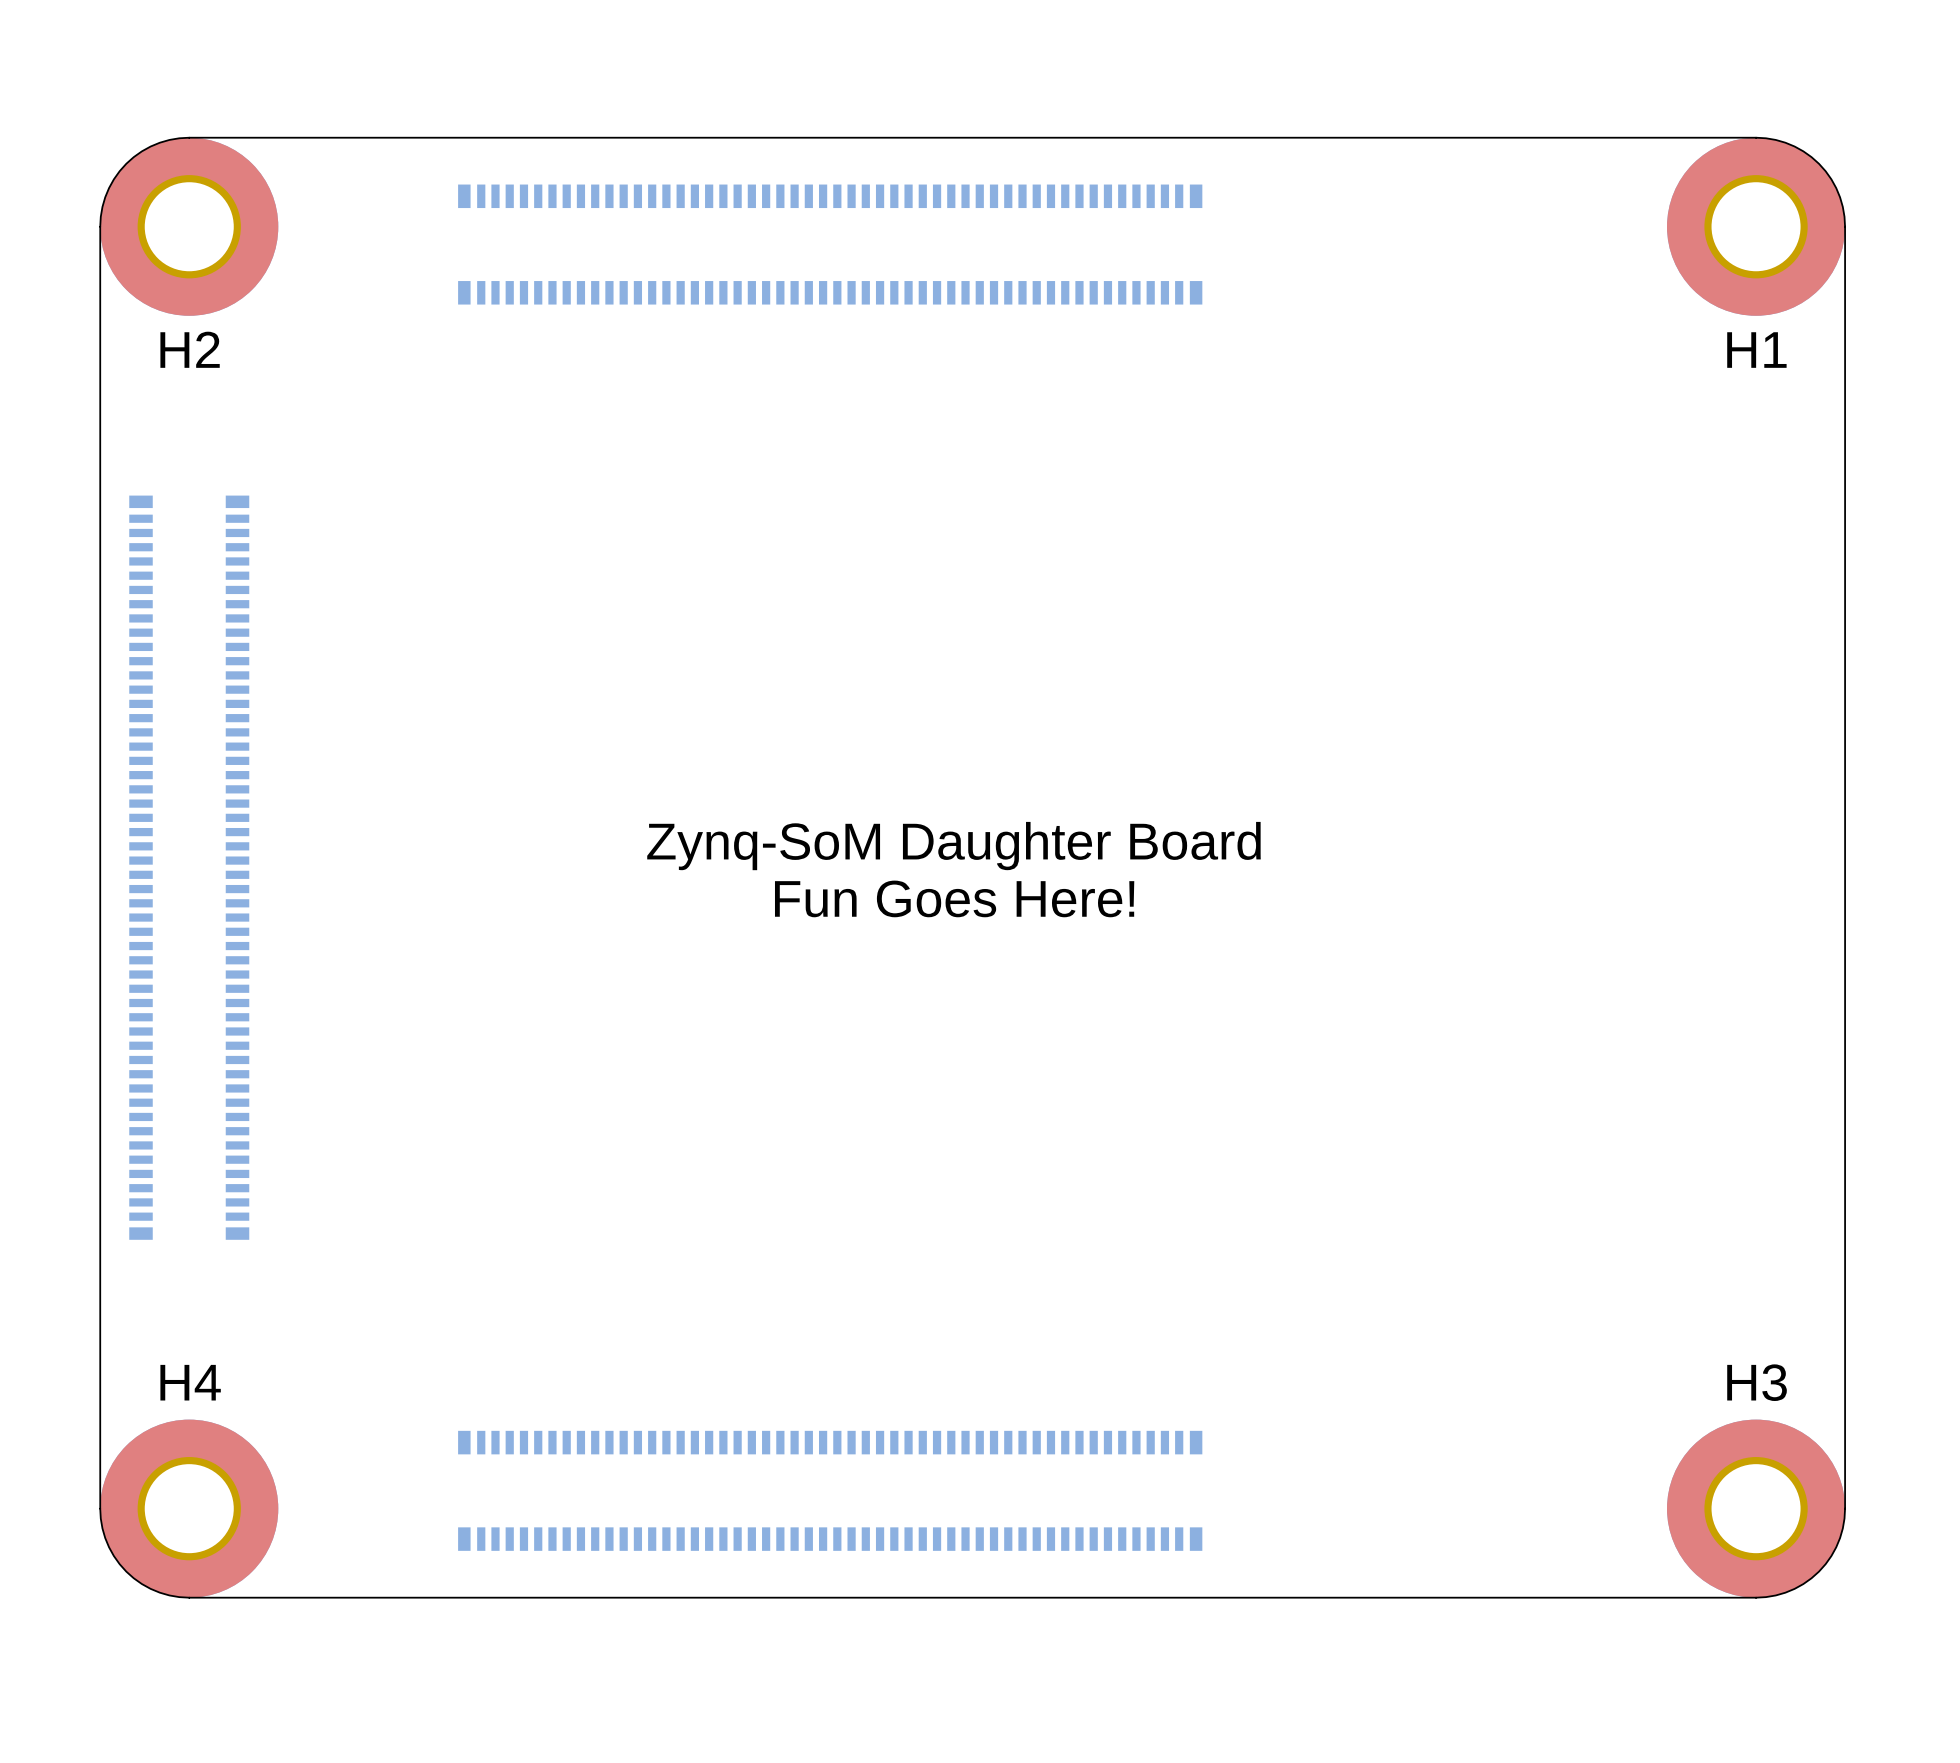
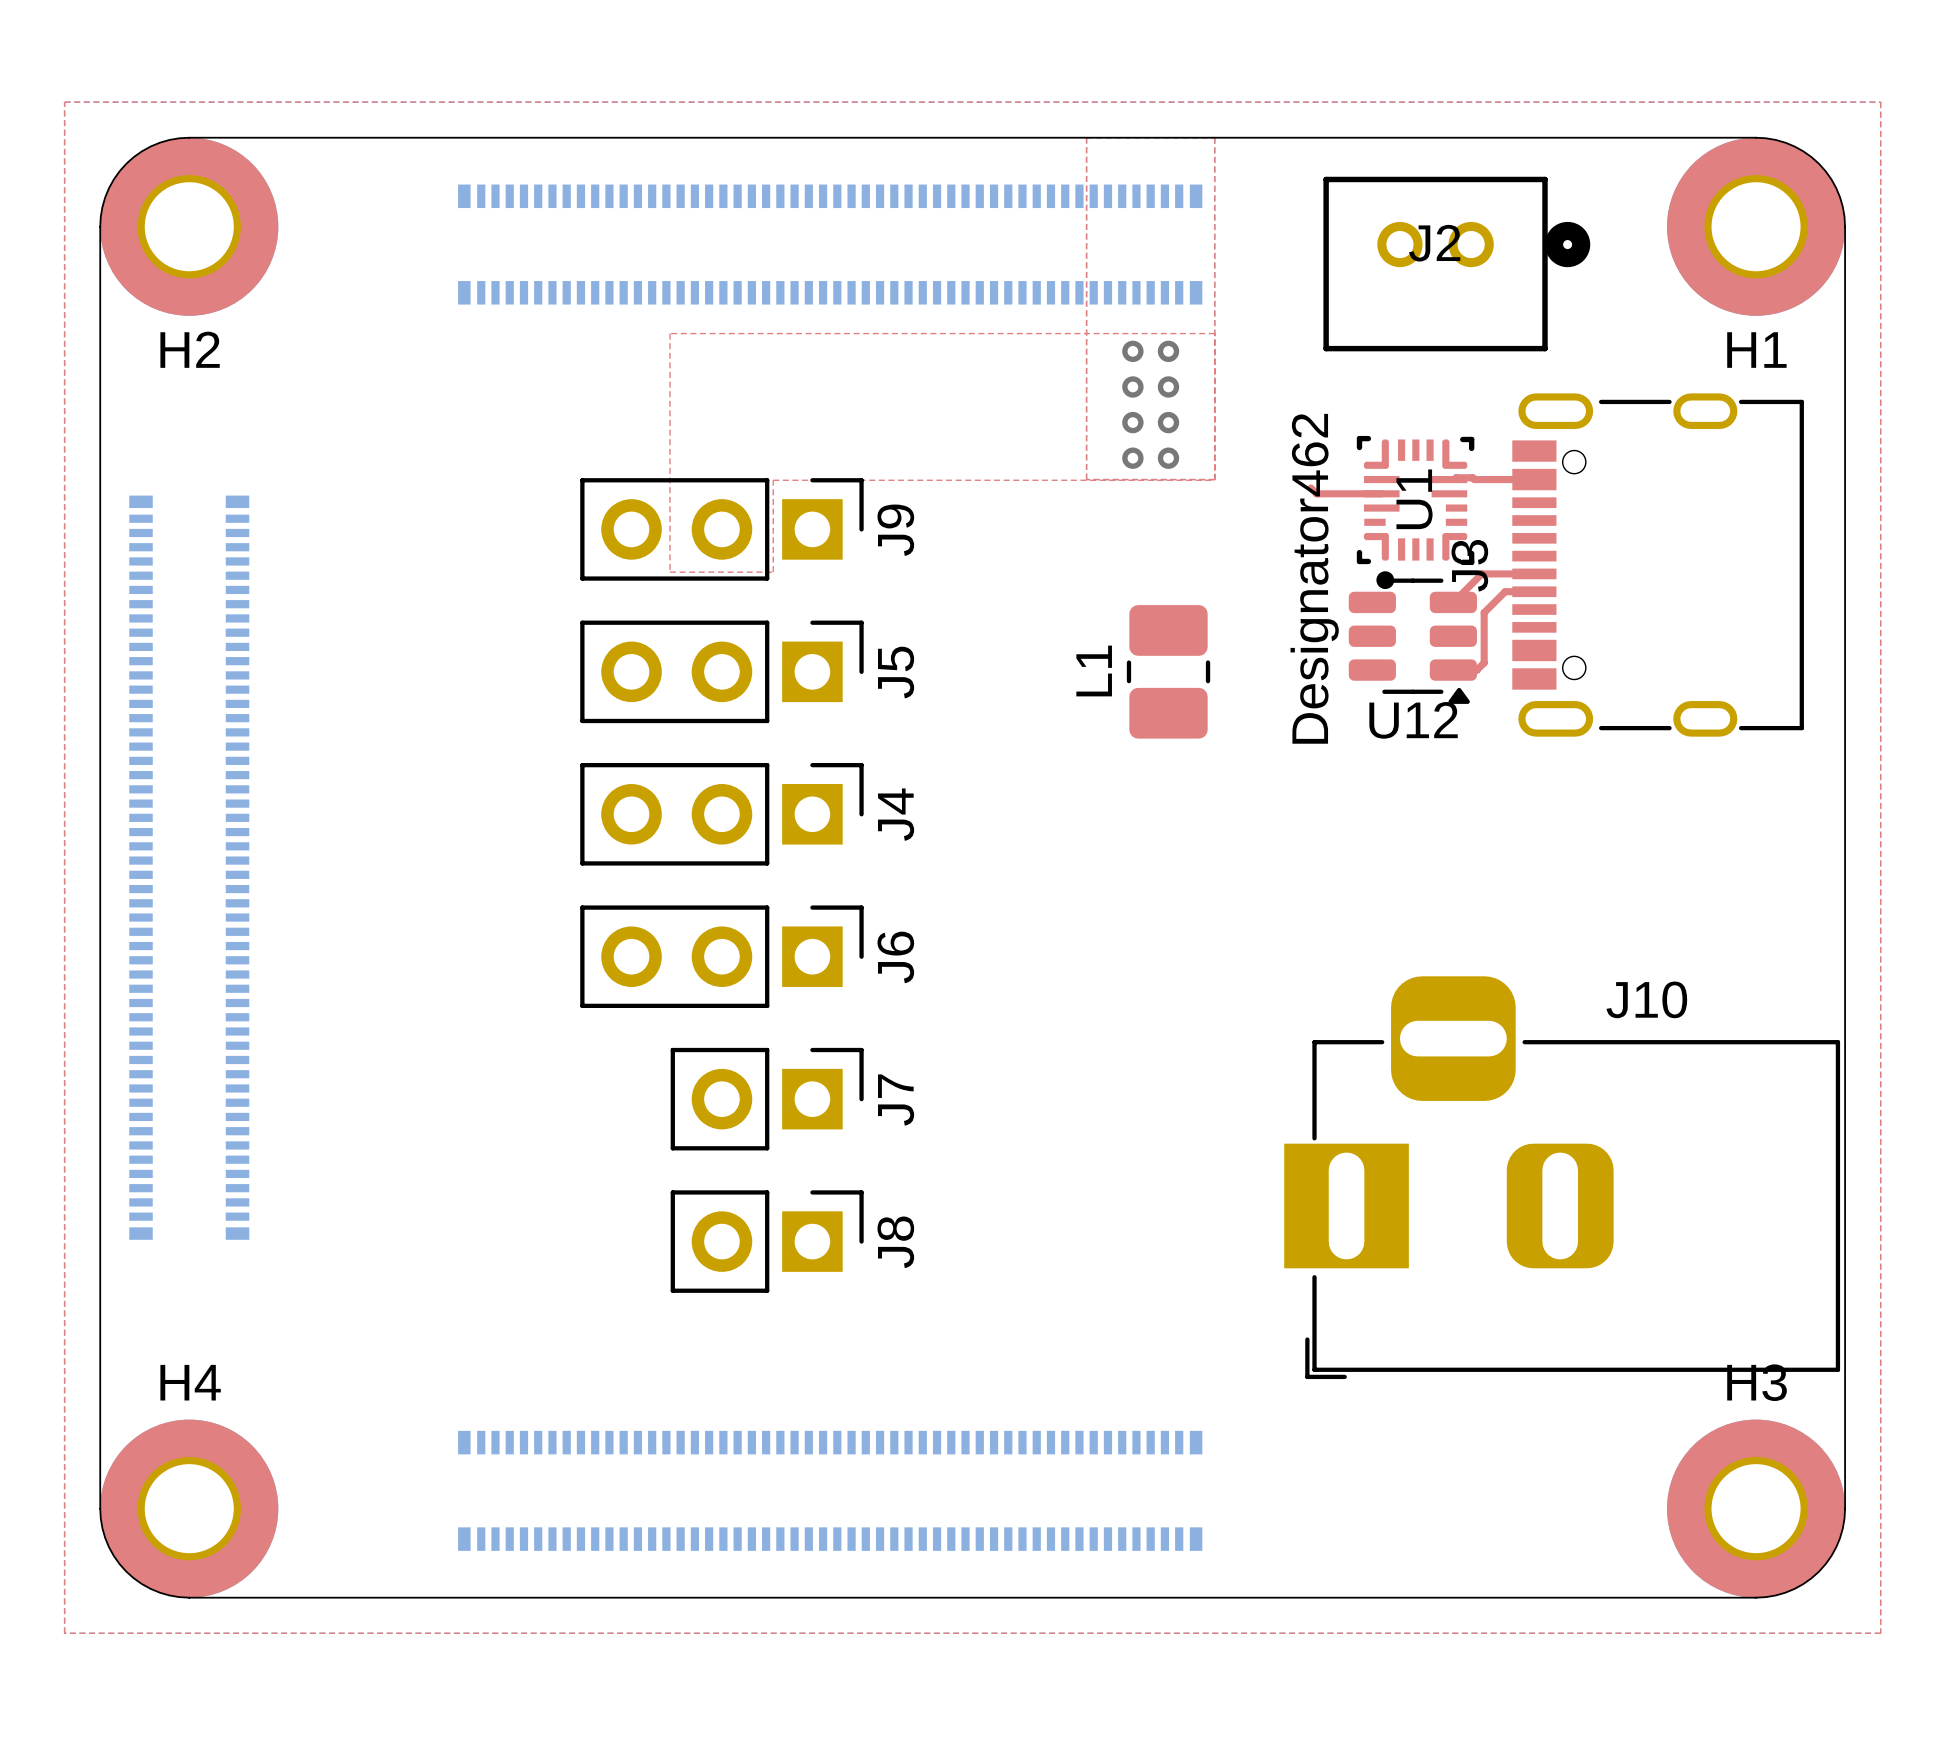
top zone outline: none -> (64, 102) (1880, 102) (1880, 1633) (64, 1633) (64, 102)
J2: none -> (1456, 264)
top zone outline: none -> (1214, 333) (669, 333) (669, 572) (773, 572) (773, 480) (1214, 480) (1214, 137) (1086, 137) (1086, 479) (1214, 479)
via: none -> (1132, 351)
via: none -> (1168, 351)
via: none -> (1132, 386)
via: none -> (1168, 386)
via: none -> (1132, 422)
via: none -> (1168, 422)
via: none -> (1132, 458)
via: none -> (1168, 458)
top track: none -> (1456, 477) (1534, 479)
top track: none -> (1310, 488) (1316, 493) (1381, 493)
U1: none -> (1415, 512)
J9: none -> (721, 529)
J3: none -> (1658, 565)
top track: none -> (1534, 573) (1481, 573) (1453, 602)
top track: none -> (1534, 591) (1505, 591) (1484, 612) (1484, 662) (1476, 670) (1453, 670)
U12: none -> (1412, 641)
J5: none -> (721, 671)
L1: none -> (1168, 671)
J4: none -> (721, 814)
text: Zynq-SoM Daughter Board (954, 846) -> none
text: Fun Goes Here! (954, 898) -> none
J6: none -> (721, 956)
J7: none -> (767, 1099)
J10: none -> (1562, 1177)
J8: none -> (767, 1241)

